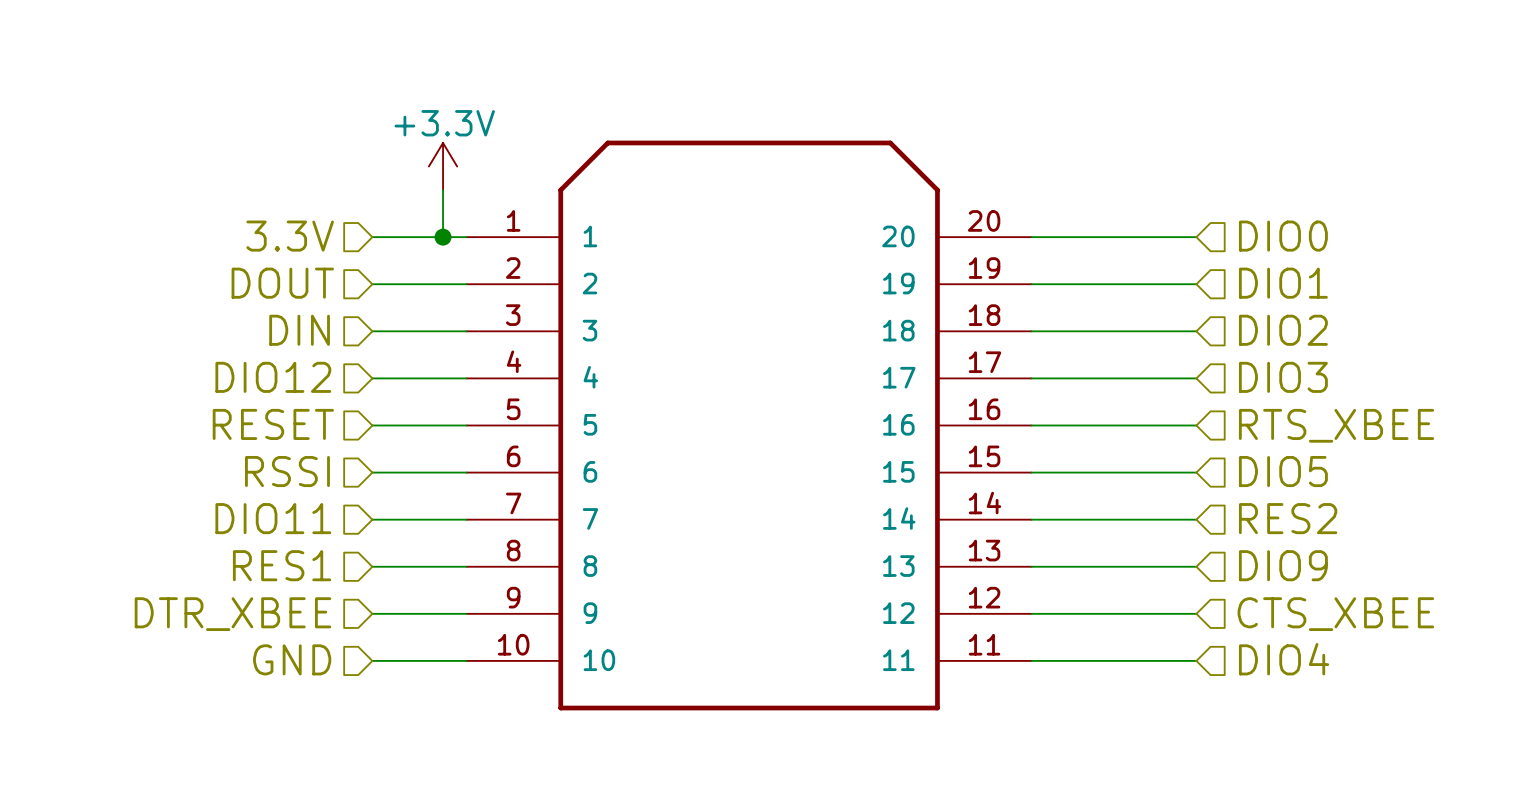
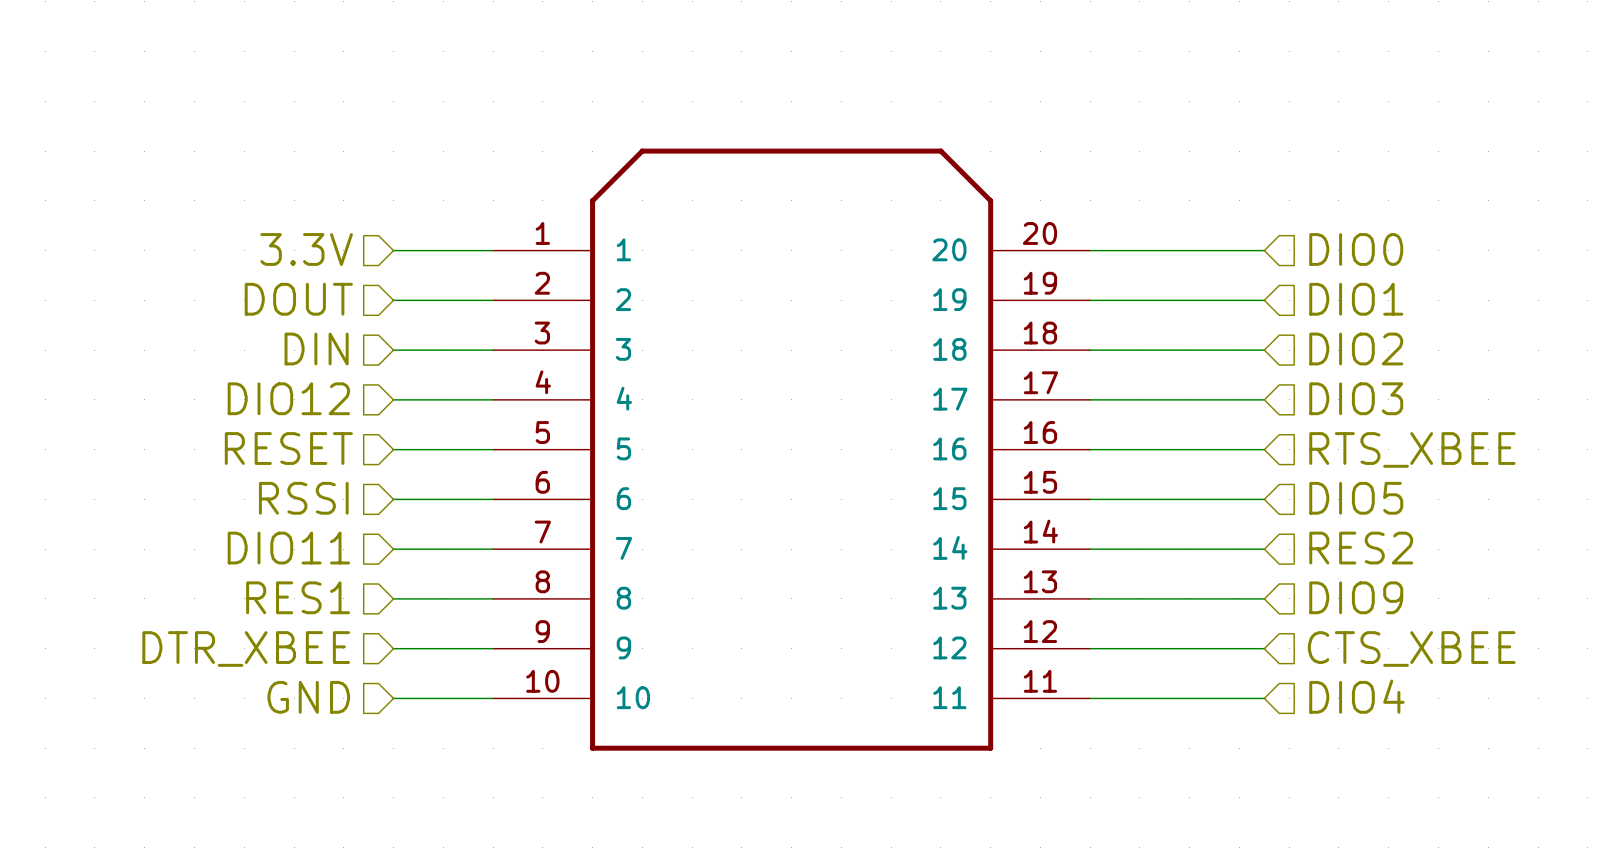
power symbol: +3.3V (443, 166) -> none
wire: (443, 190) (443, 237) -> none
junction: (443, 237) -> none

